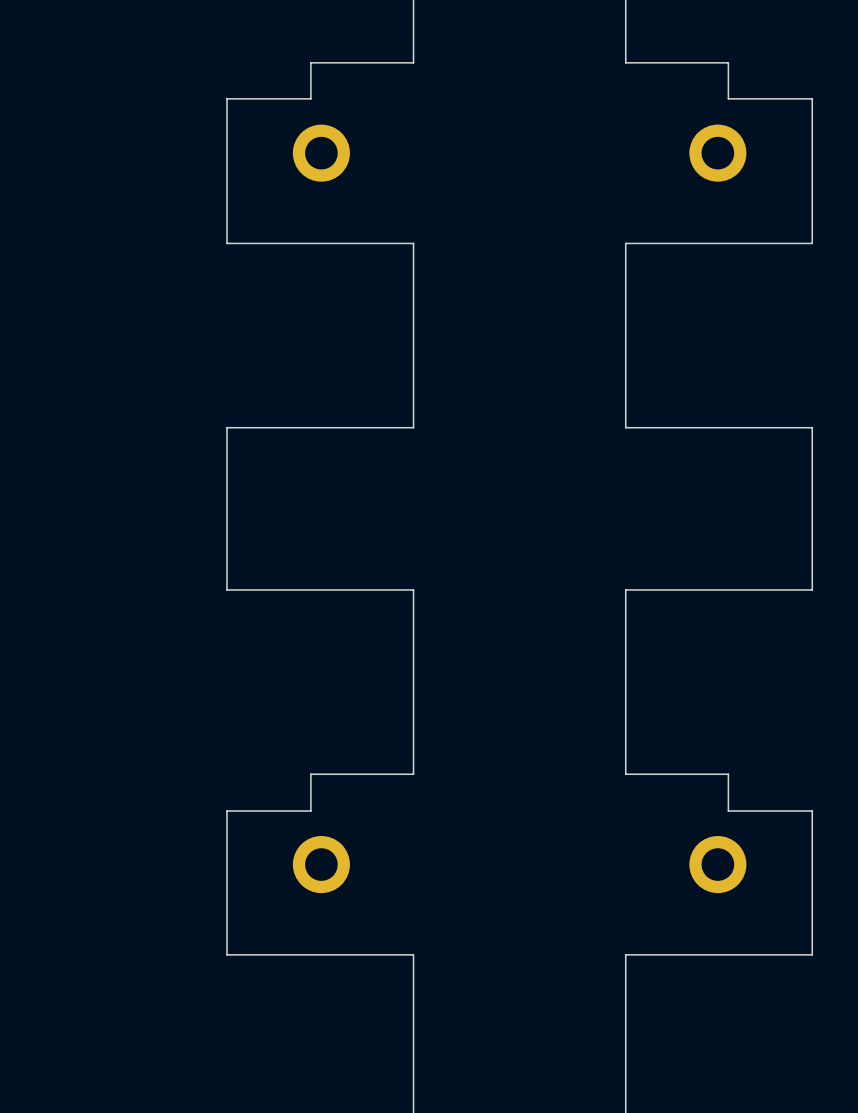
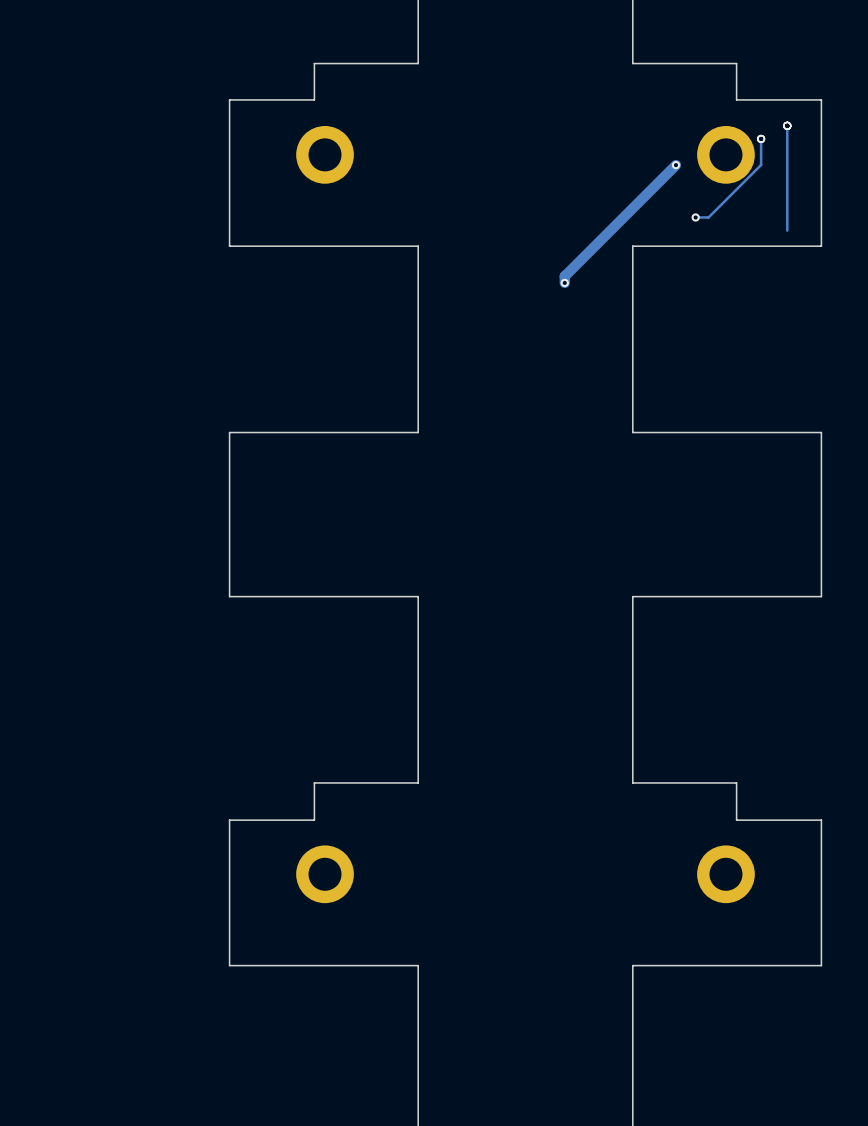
track: none -> (787, 125) (787, 230)
via: none -> (787, 125)
track: none -> (761, 138) (761, 164) (708, 217) (695, 217)
via: none -> (761, 138)
track: none -> (675, 165) (564, 276) (564, 282)
via: none -> (675, 165)
via: none -> (695, 217)
via: none -> (564, 282)

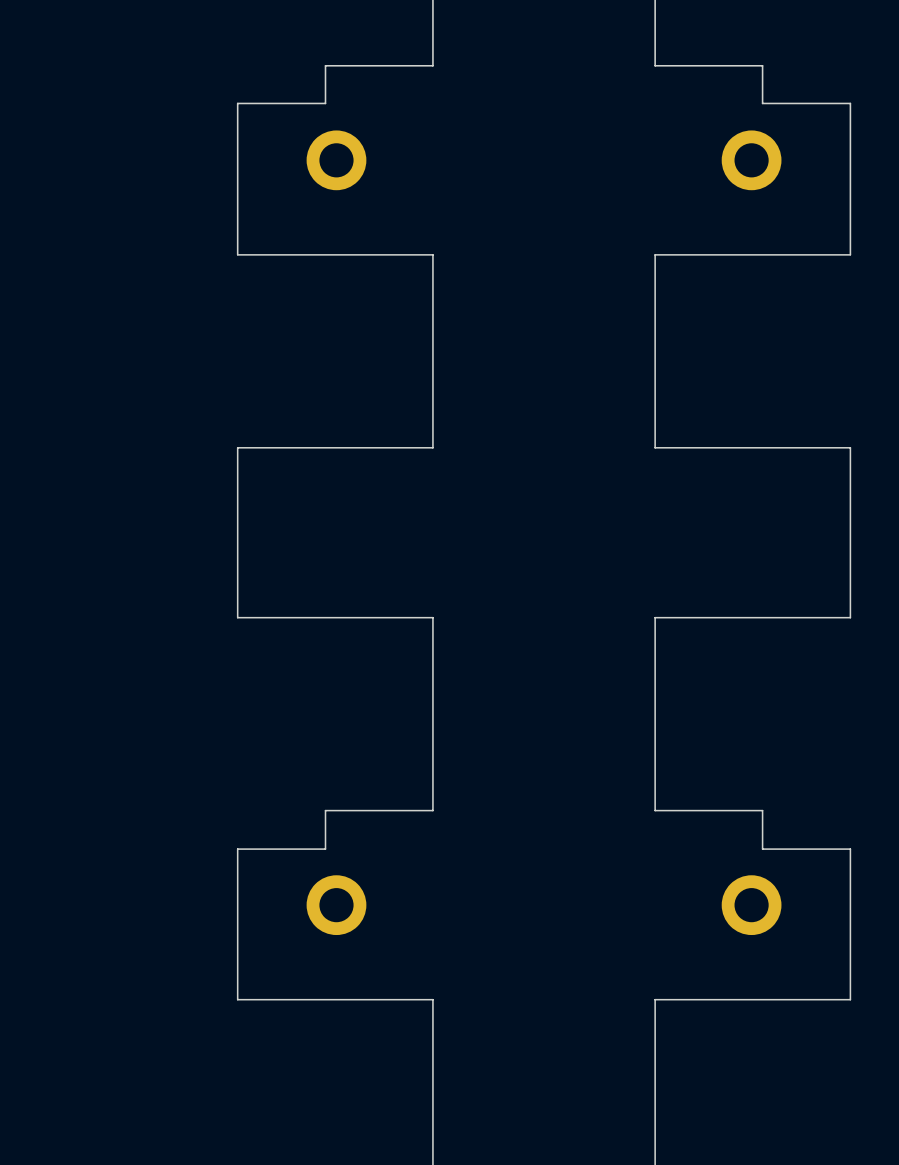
track: (787, 125) (787, 230) -> none
via: (787, 125) -> none
track: (761, 138) (761, 164) (708, 217) (695, 217) -> none
via: (761, 138) -> none
track: (675, 165) (564, 276) (564, 282) -> none
via: (675, 165) -> none
via: (695, 217) -> none
via: (564, 282) -> none

